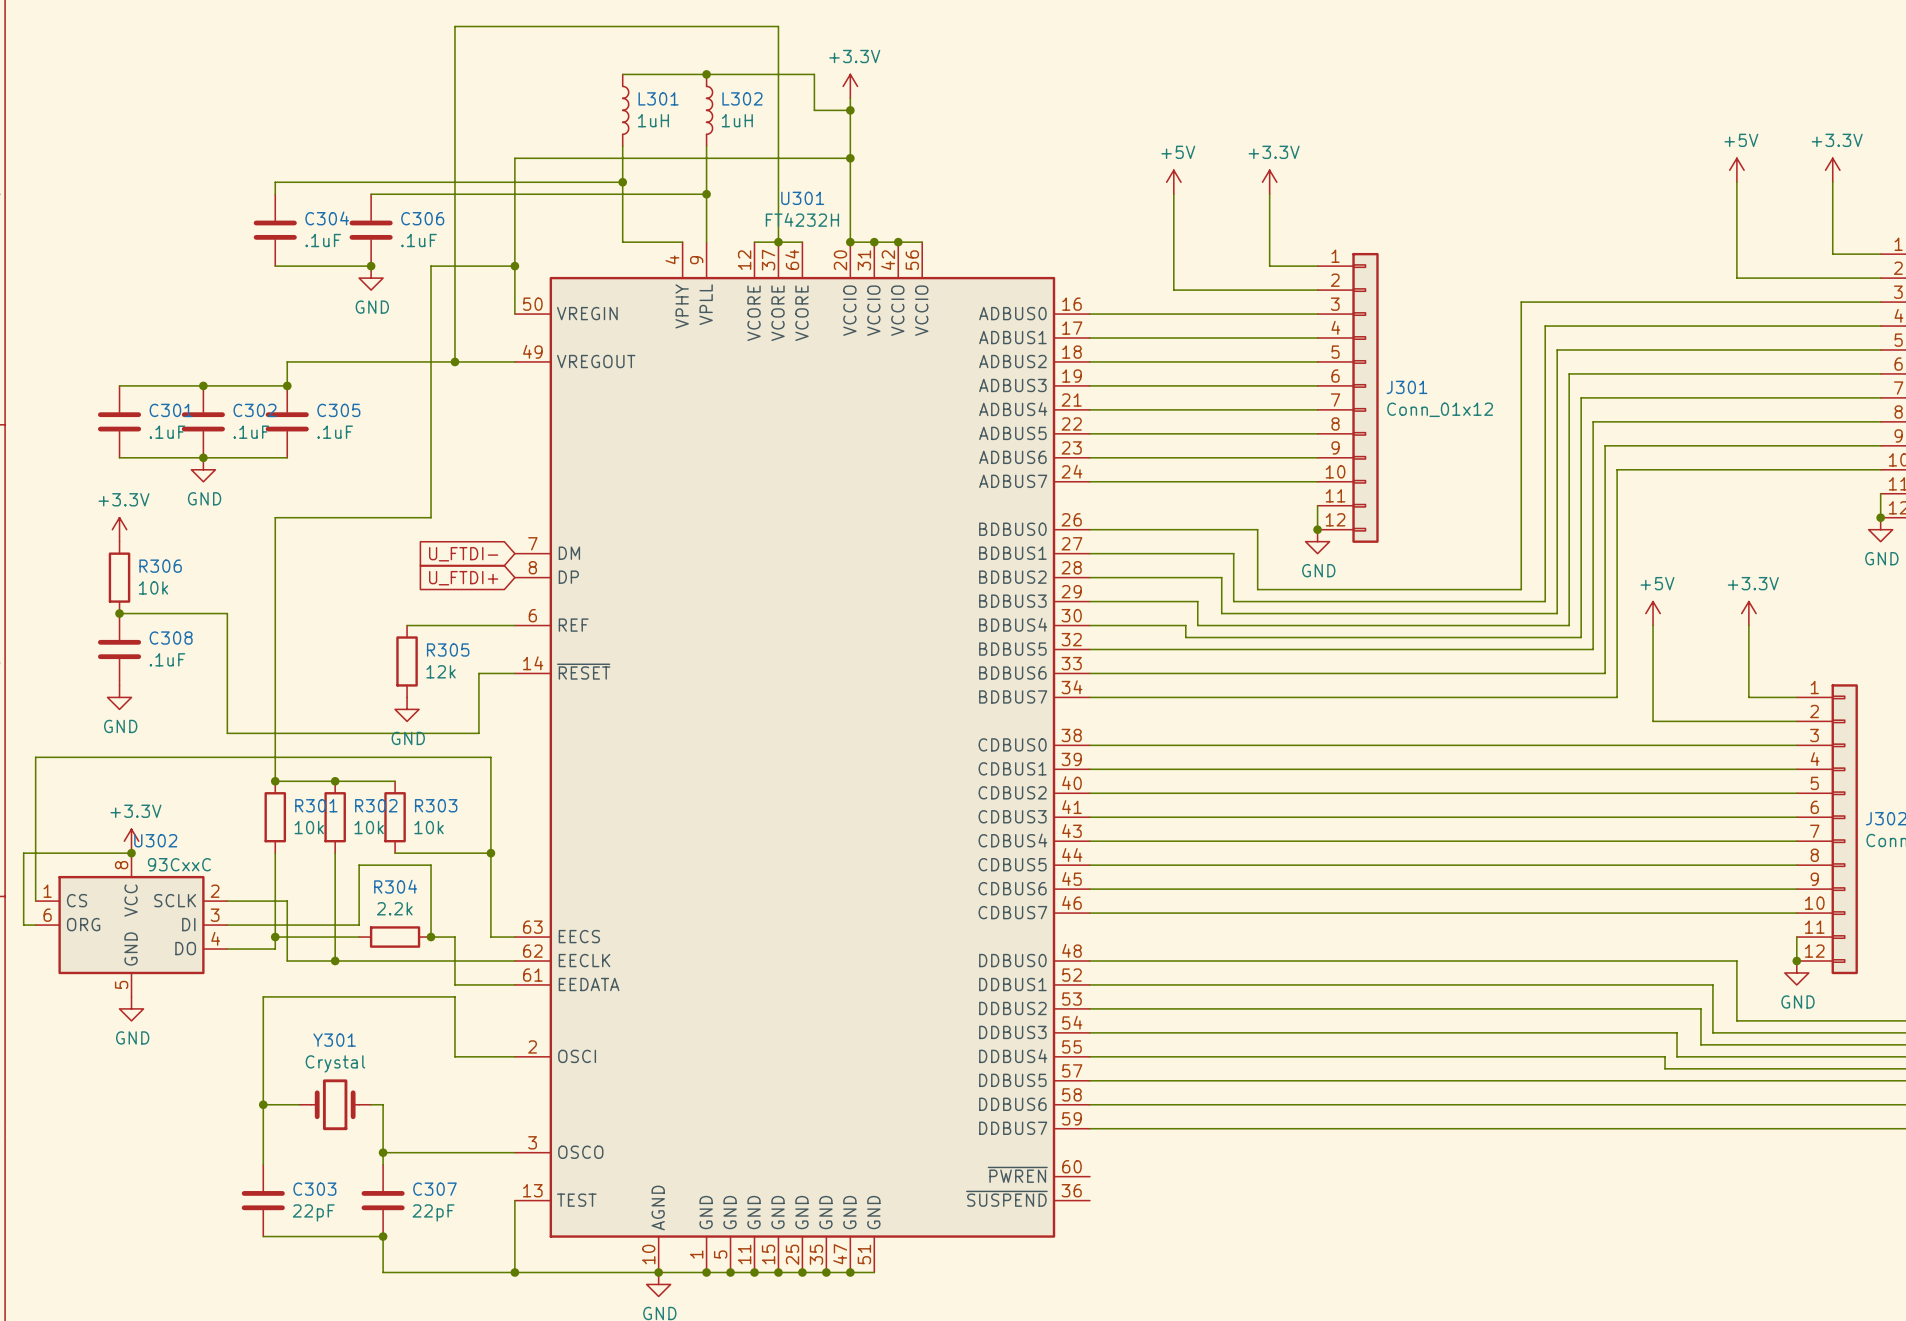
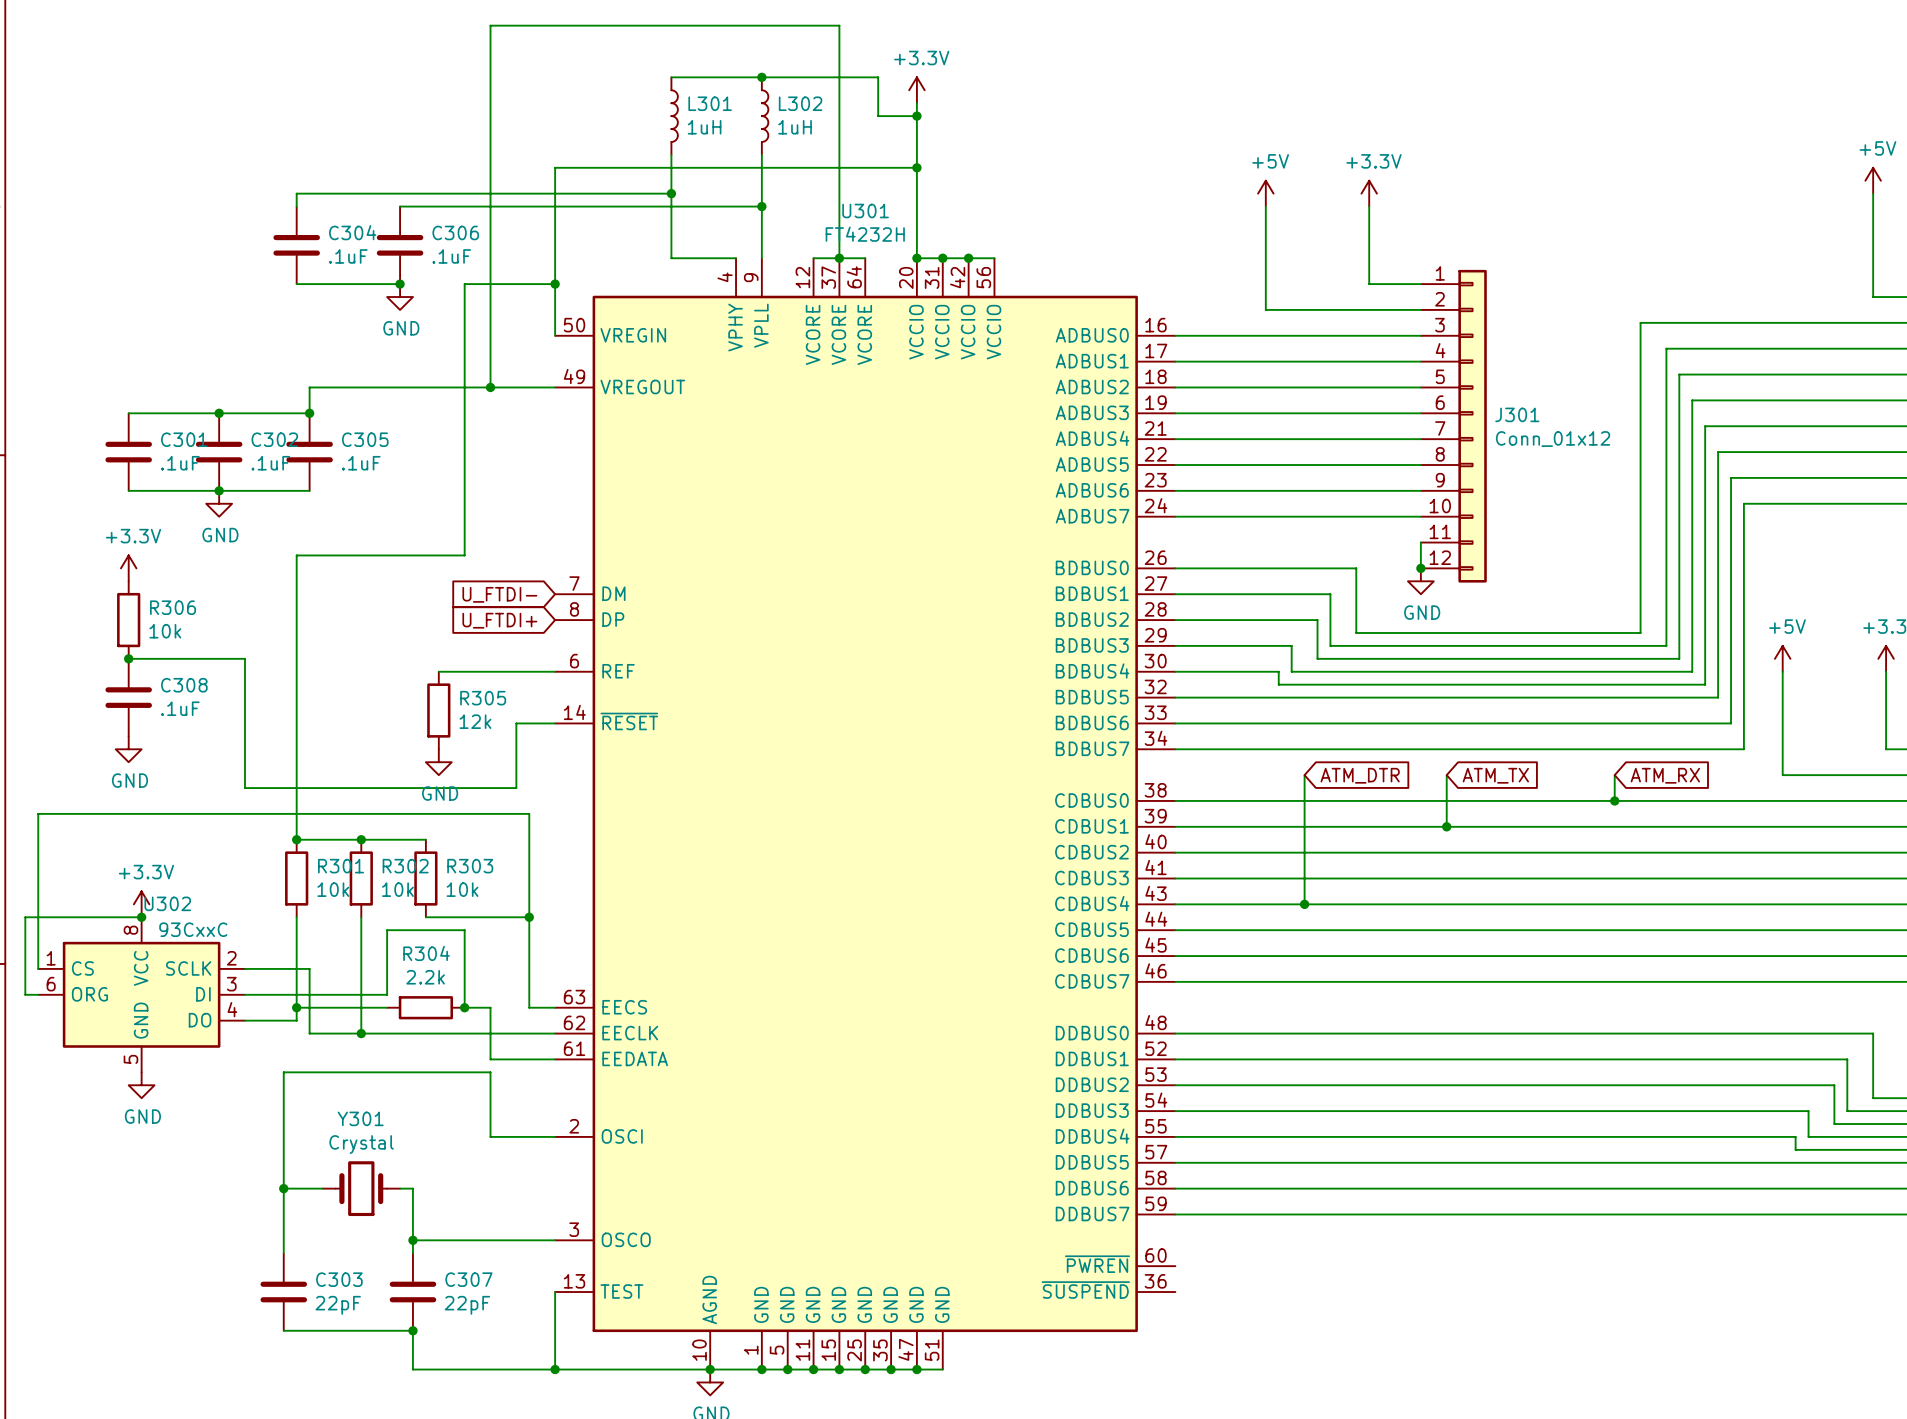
wire: none -> (1304, 775) (1304, 904)
global label: none -> ATM_DTR (1360, 775)
wire: none -> (1446, 775) (1446, 826)
global label: none -> ATM_TX (1495, 775)
wire: none -> (1614, 775) (1614, 800)
global label: none -> ATM_RX (1665, 775)
junction: none -> (1614, 800)
junction: none -> (1446, 826)
junction: none -> (1304, 904)

